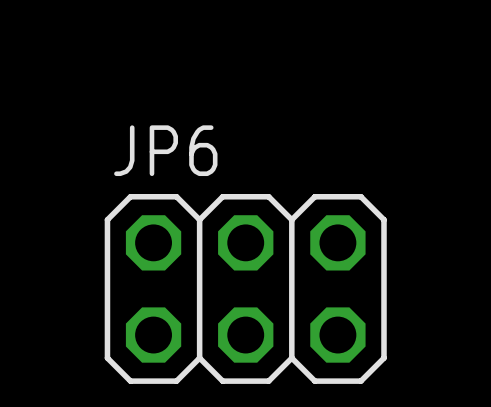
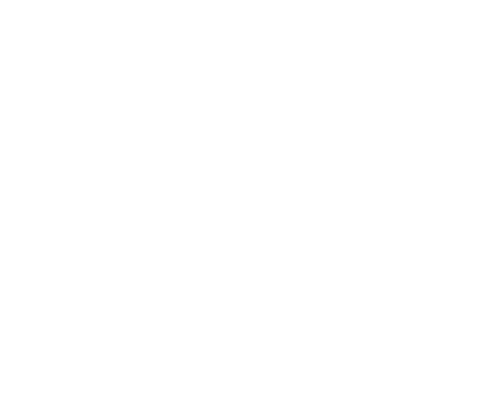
JP6: (245, 288) -> none

